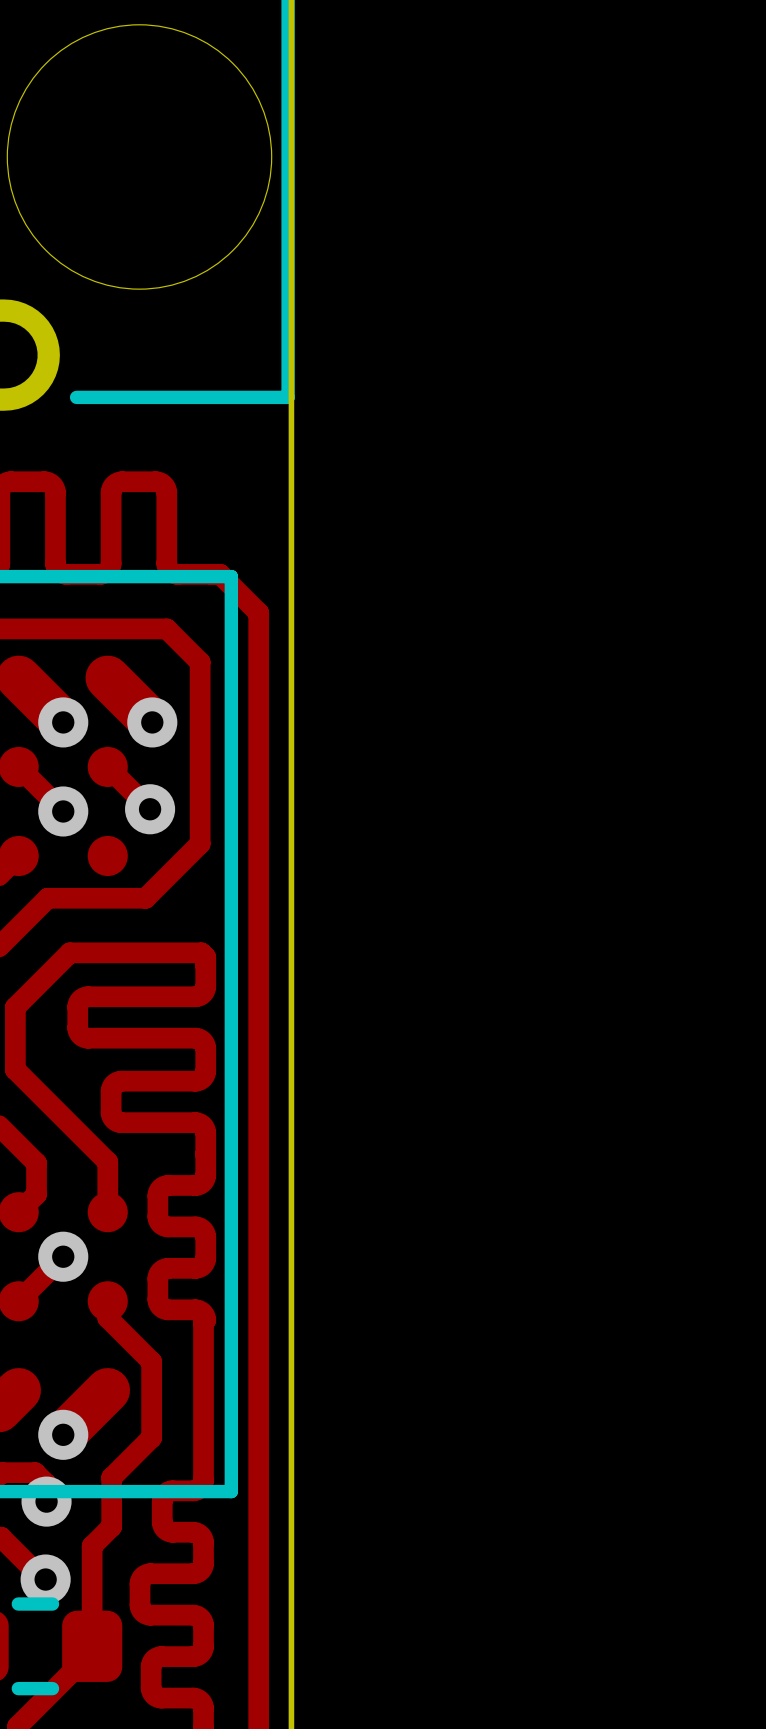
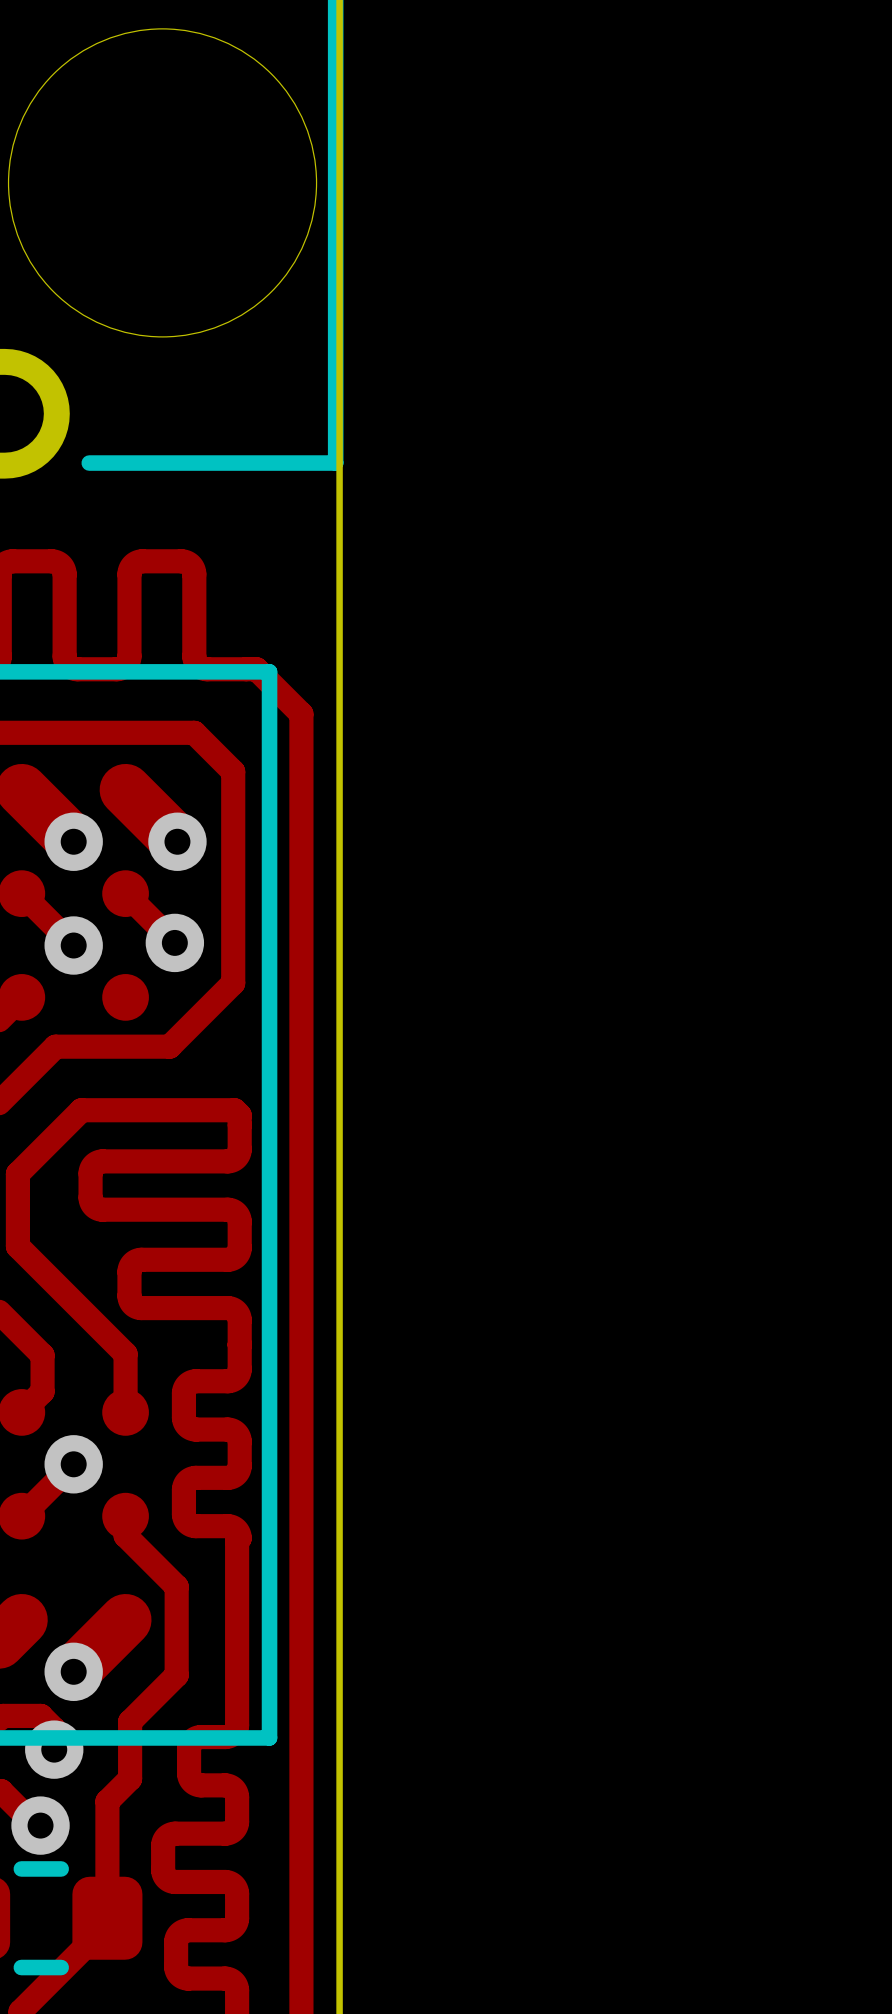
via position: (45, 1579) -> (40, 1825)

